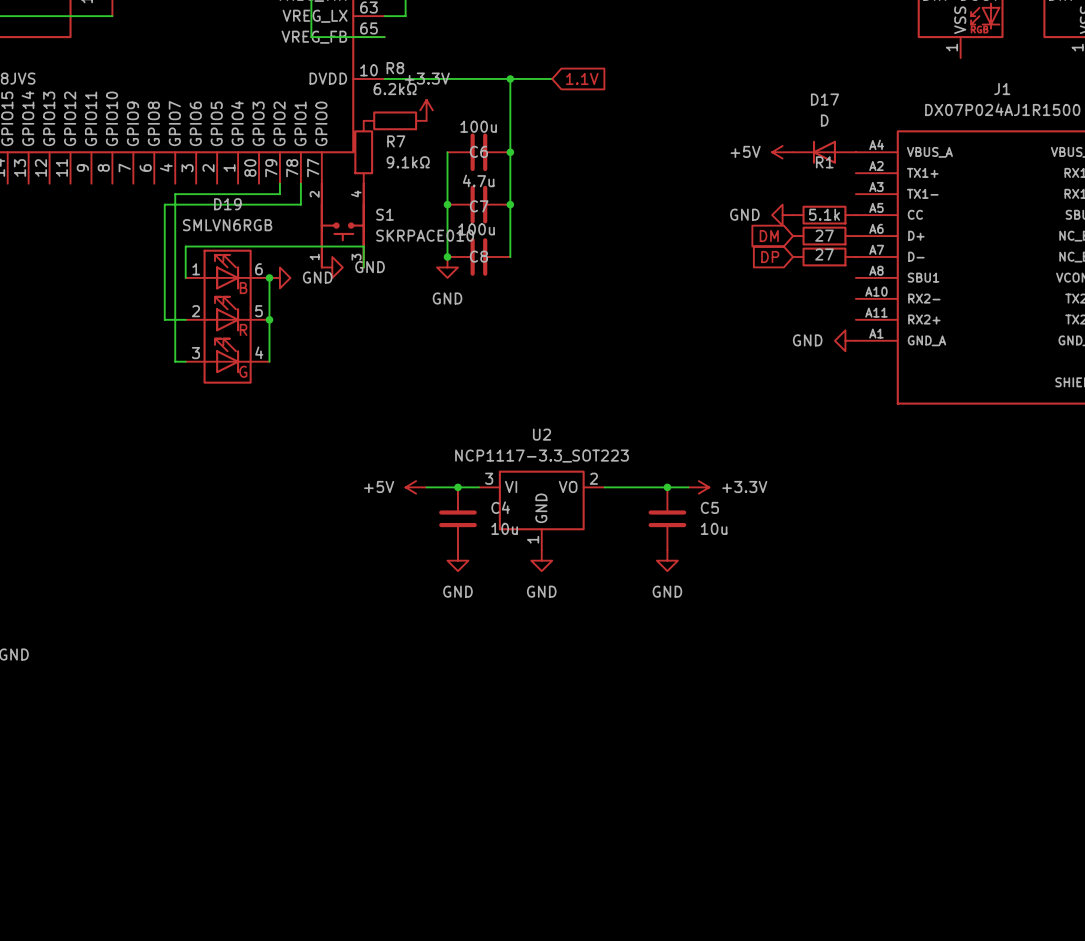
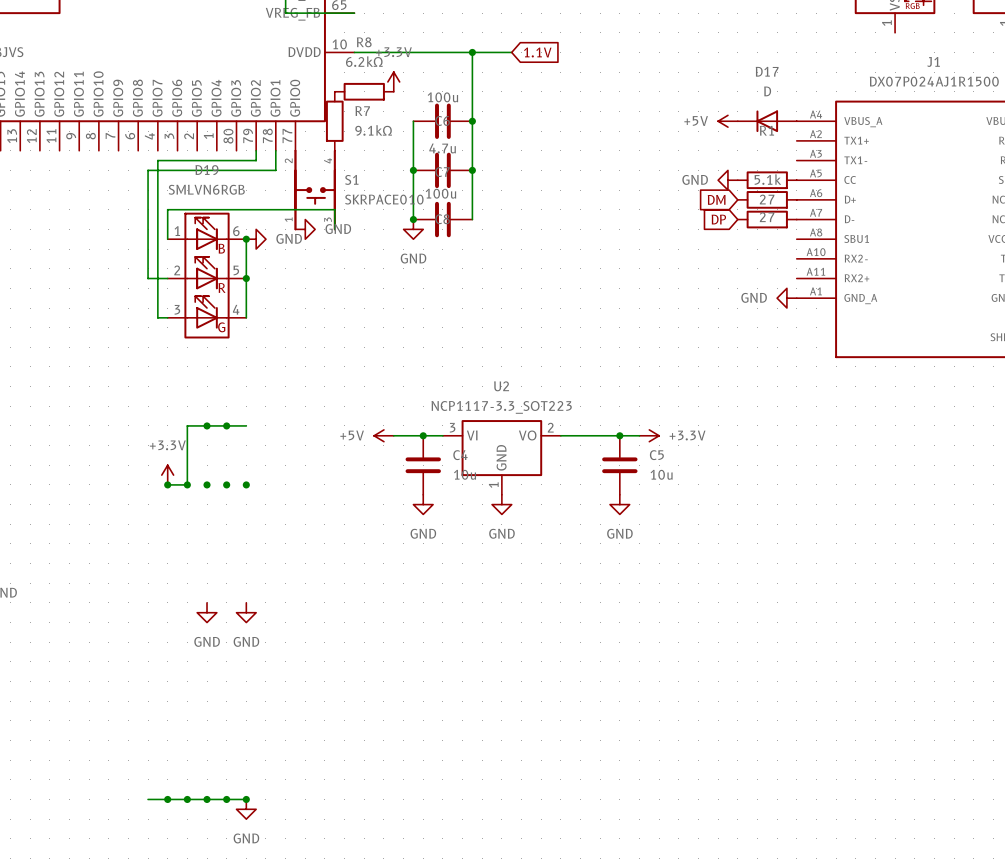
junction: none -> (207, 425)
junction: none -> (226, 425)
wire: none -> (246, 425) (187, 425) (187, 484) (167, 484)
power symbol: none -> +3.3V (167, 475)
junction: none -> (167, 484)
junction: none -> (187, 484)
junction: none -> (207, 484)
junction: none -> (226, 484)
junction: none -> (246, 484)
power symbol: none -> GND (207, 612)
power symbol: none -> GND (246, 612)
wire: none -> (148, 799) (246, 799)
junction: none -> (167, 799)
junction: none -> (187, 799)
junction: none -> (207, 799)
junction: none -> (226, 799)
junction: none -> (246, 799)
power symbol: none -> GND (246, 809)

